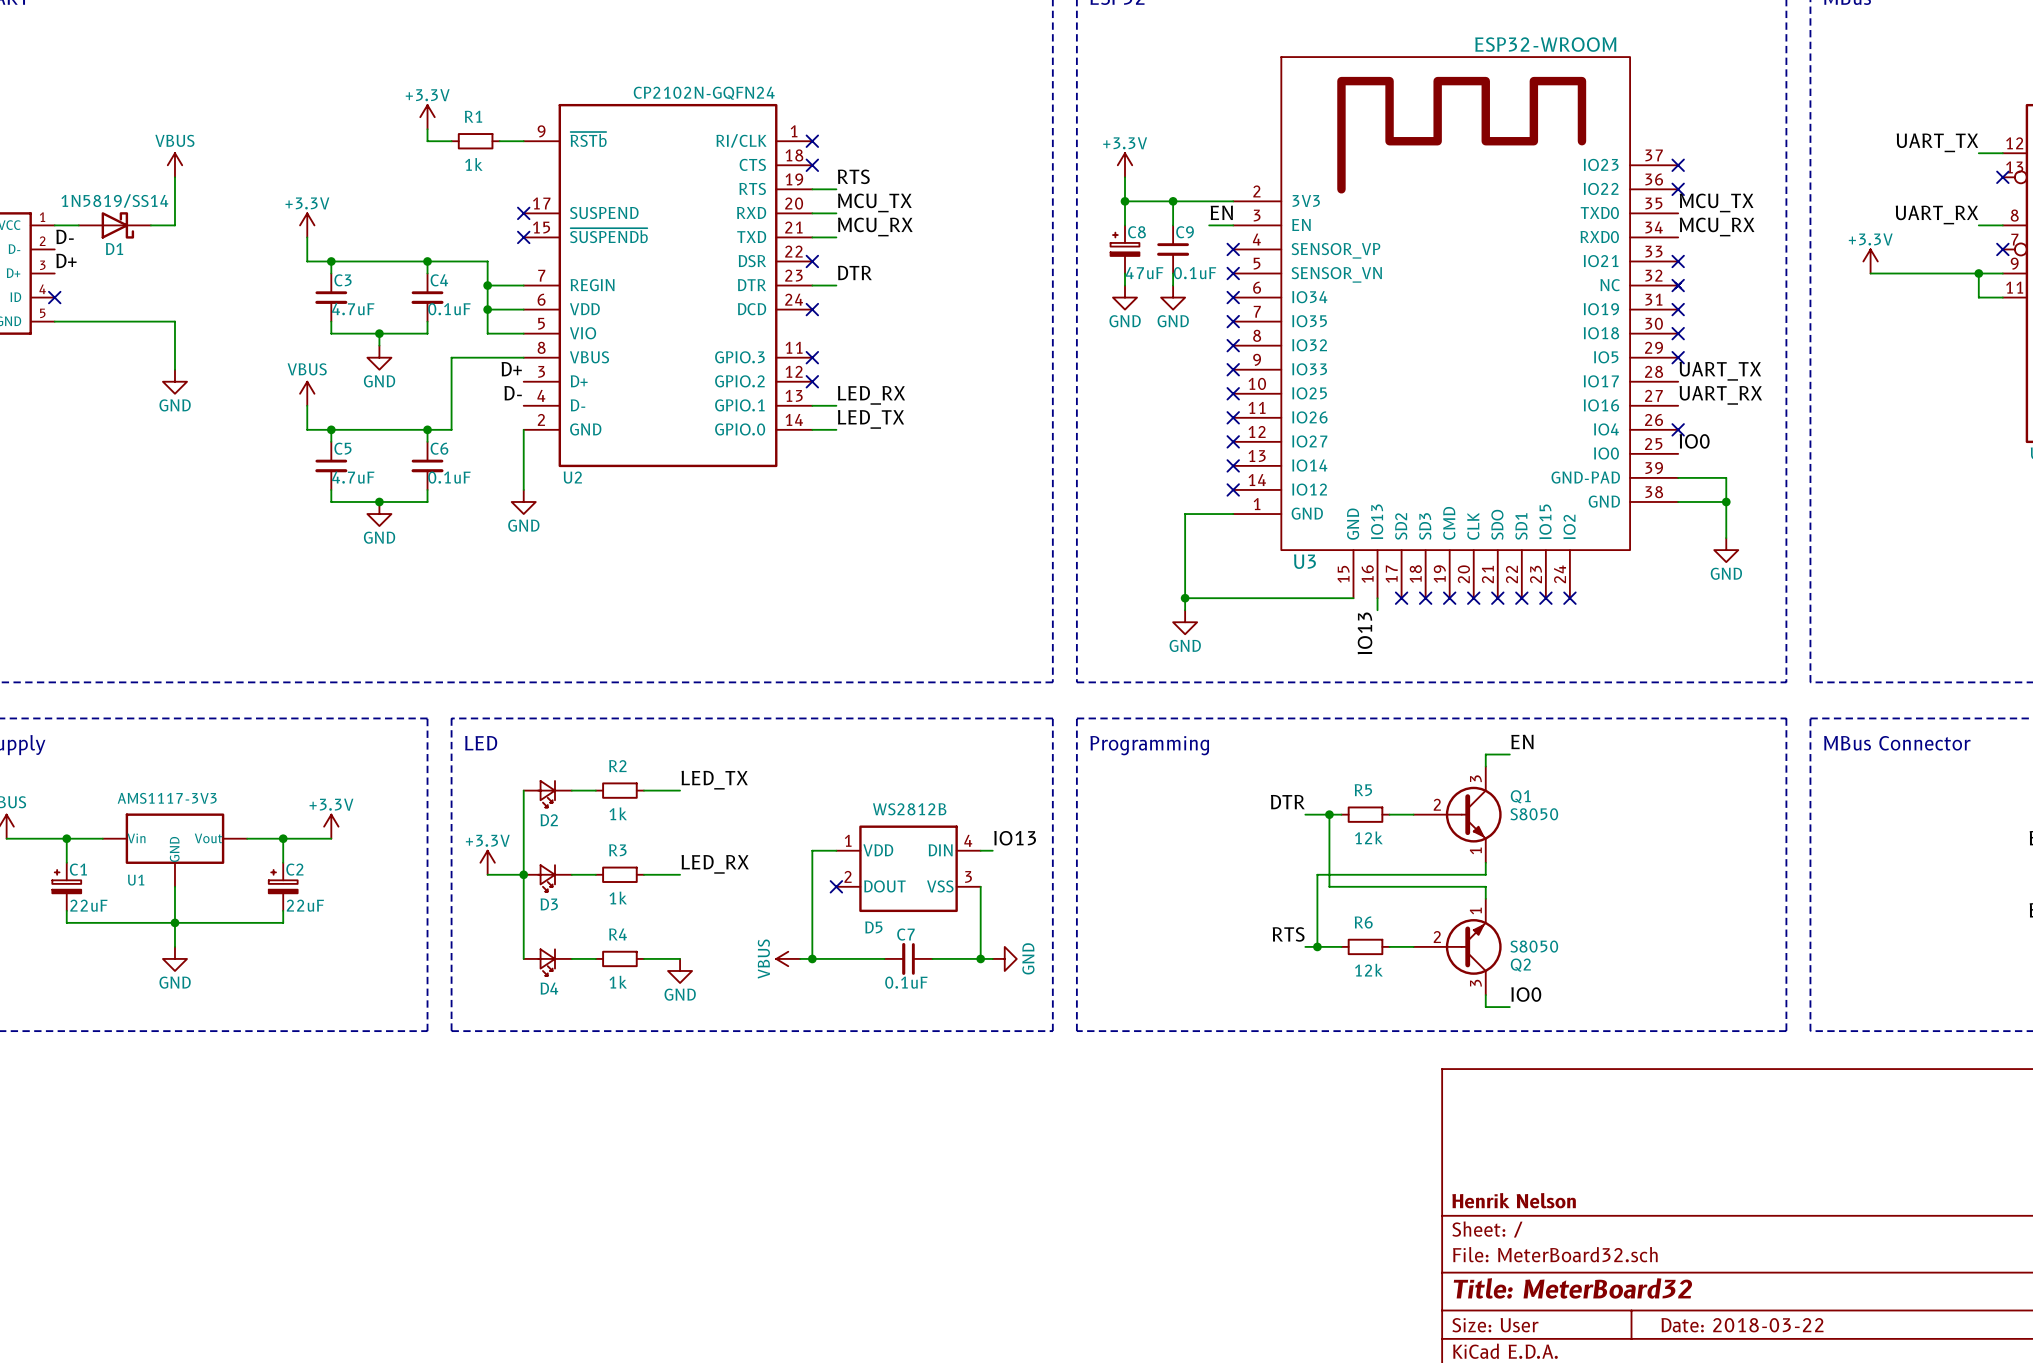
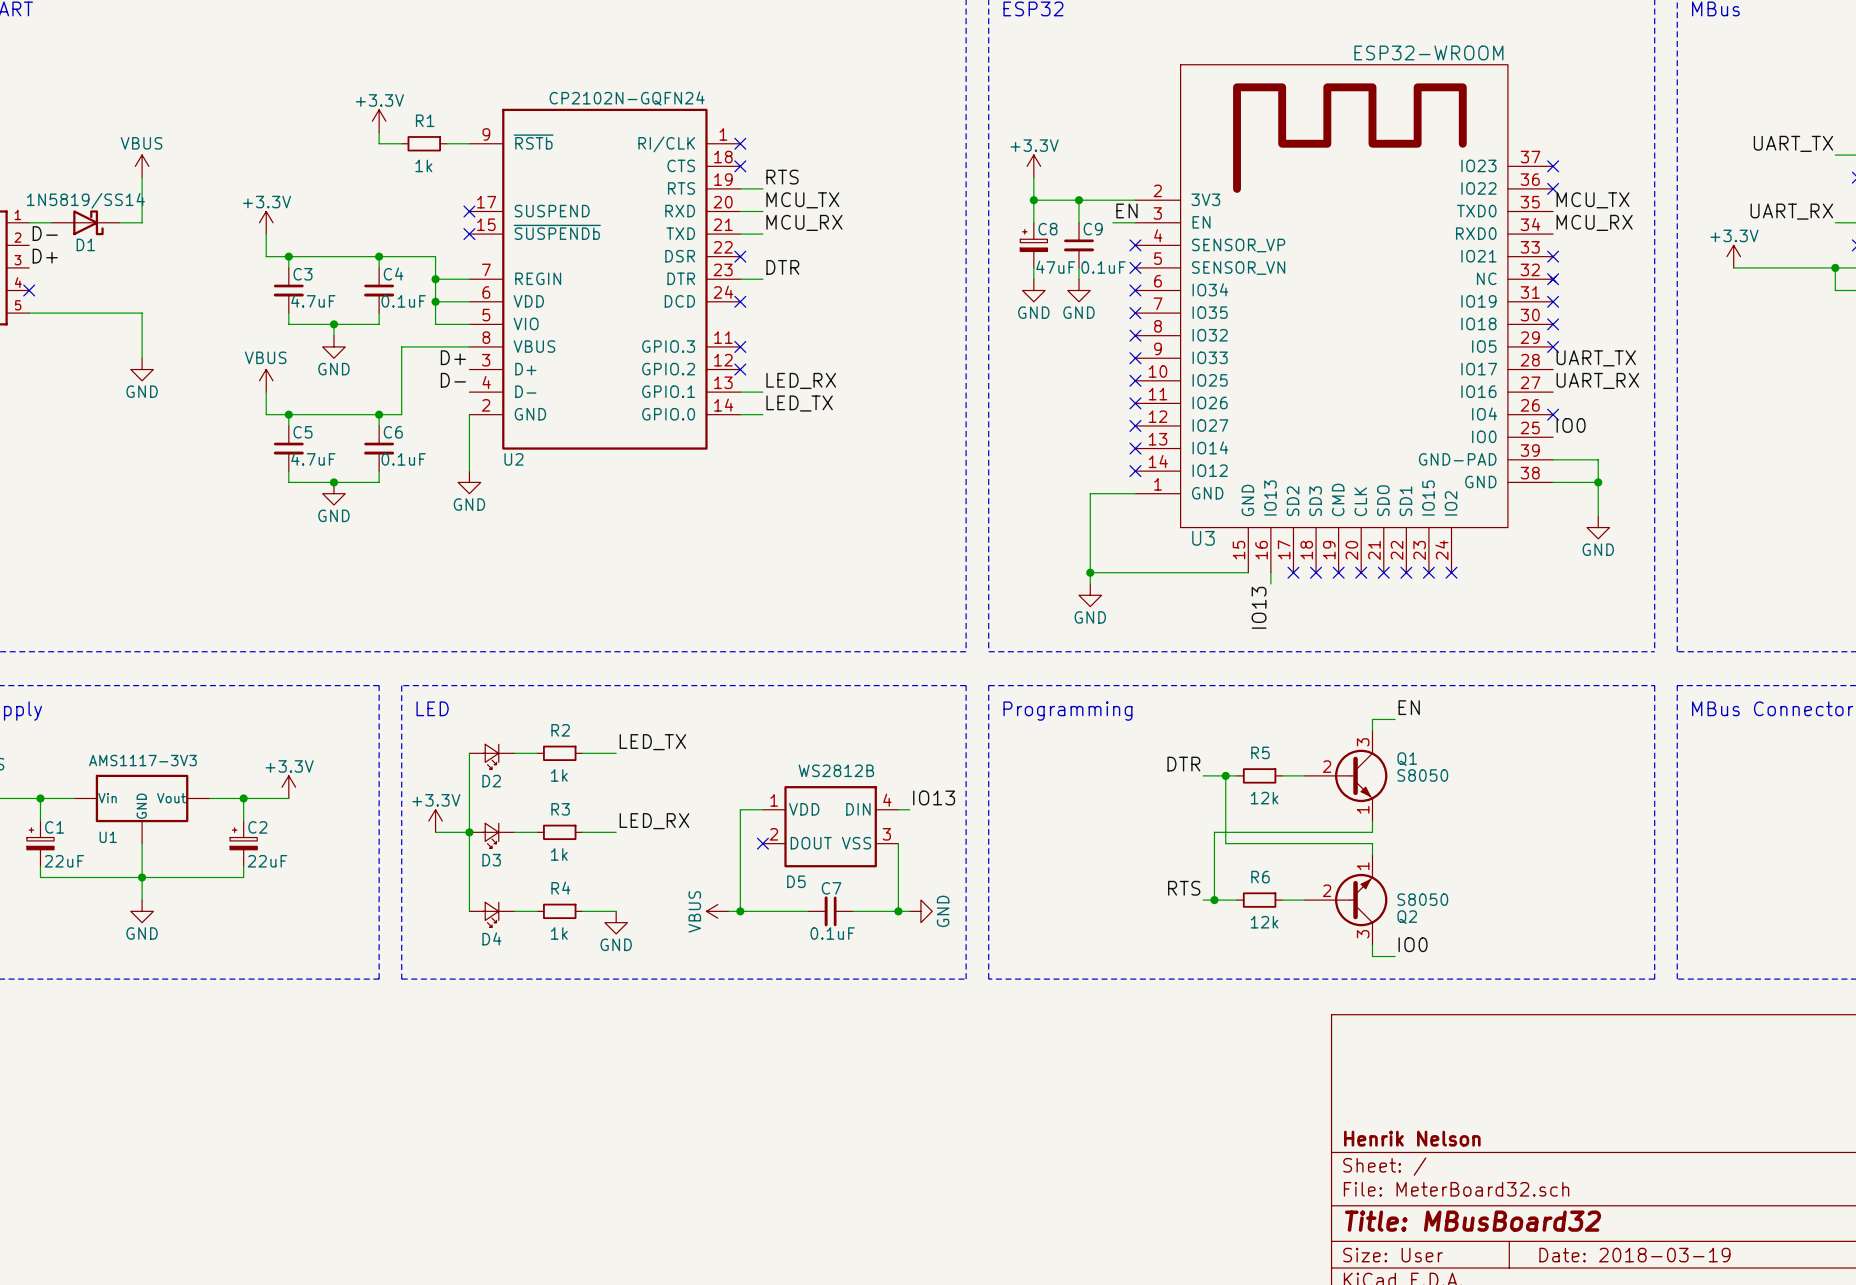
title block: Title: MeterBoard32 (1572, 1288) -> Title: MBusBoard32 (1473, 1221)
title block: Date: 2018-03-22 (1742, 1325) -> Date: 2018-03-19 (1634, 1255)

